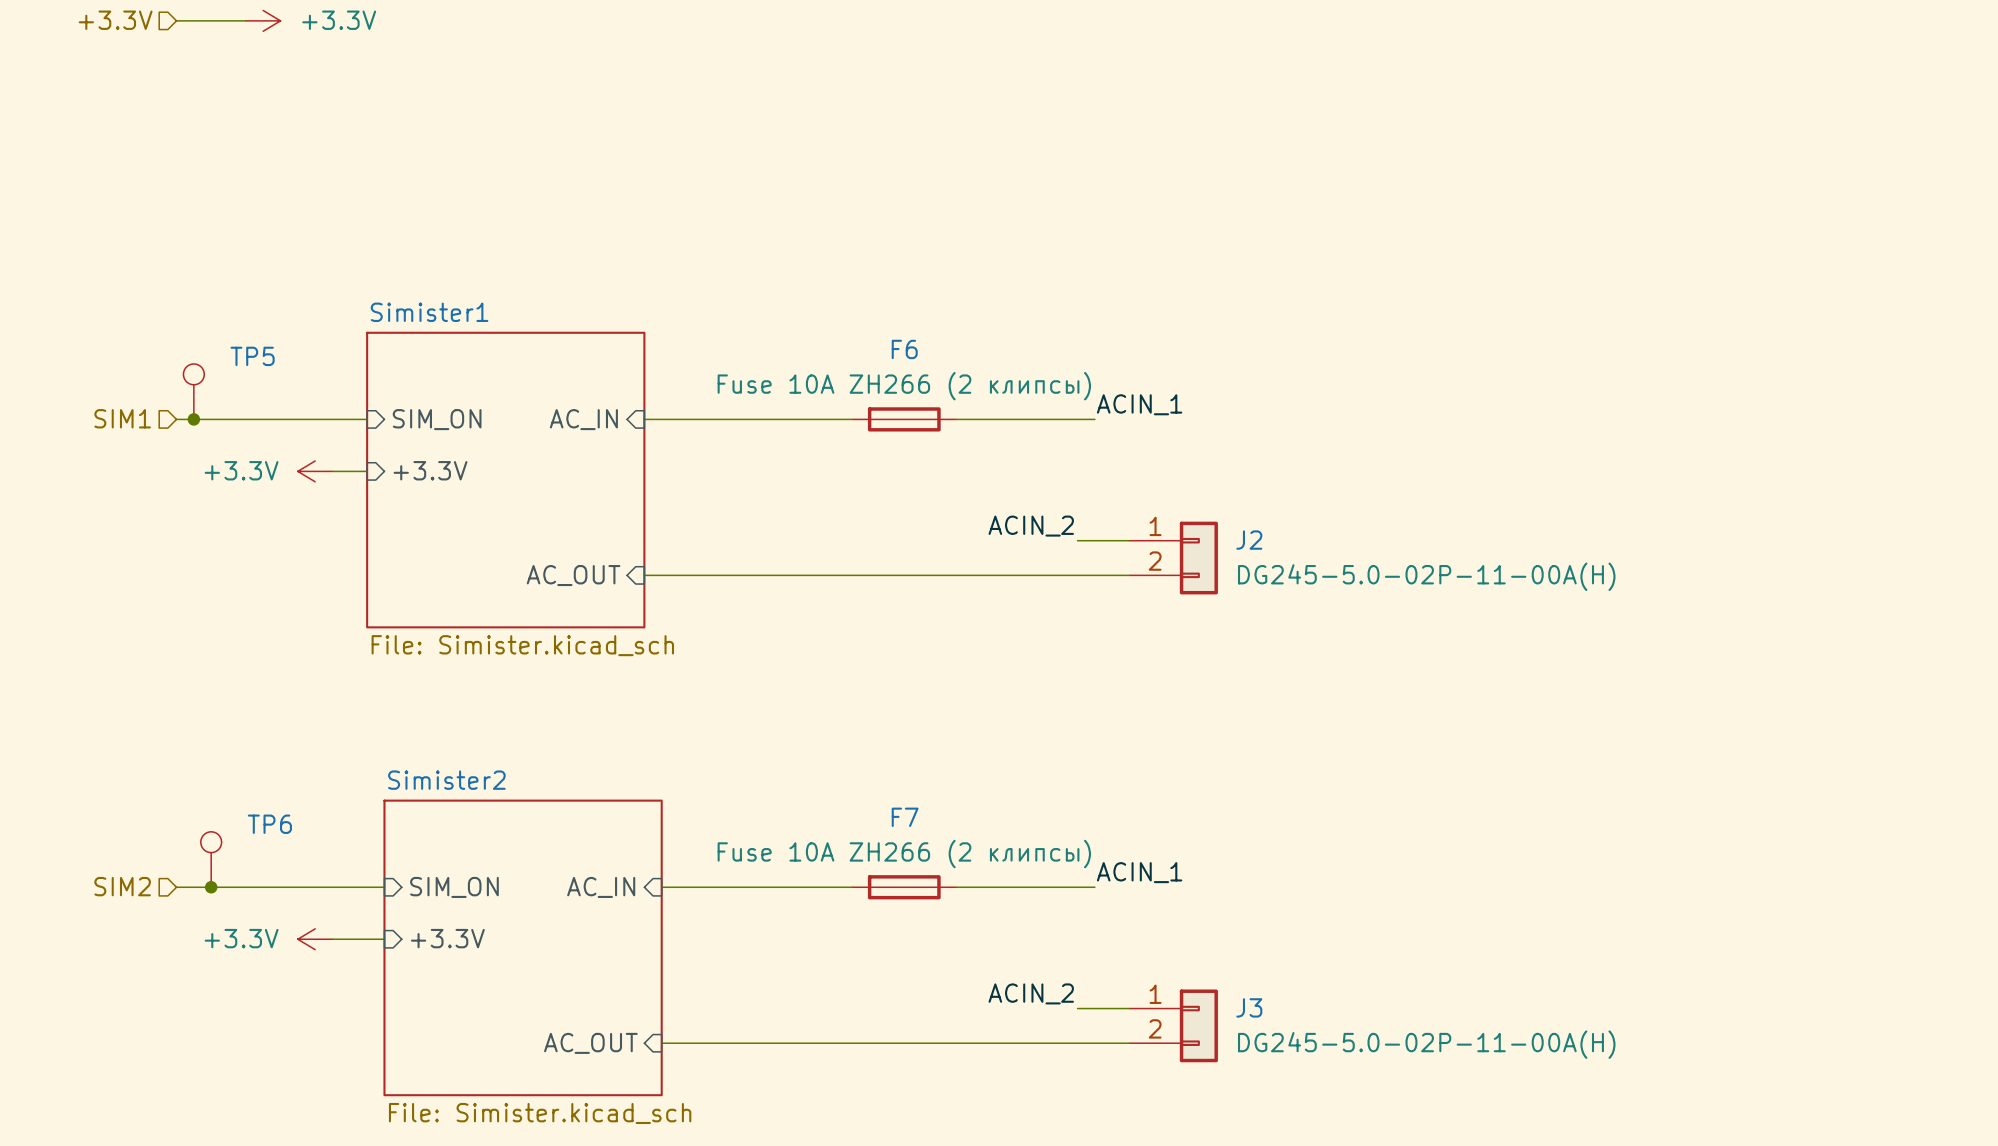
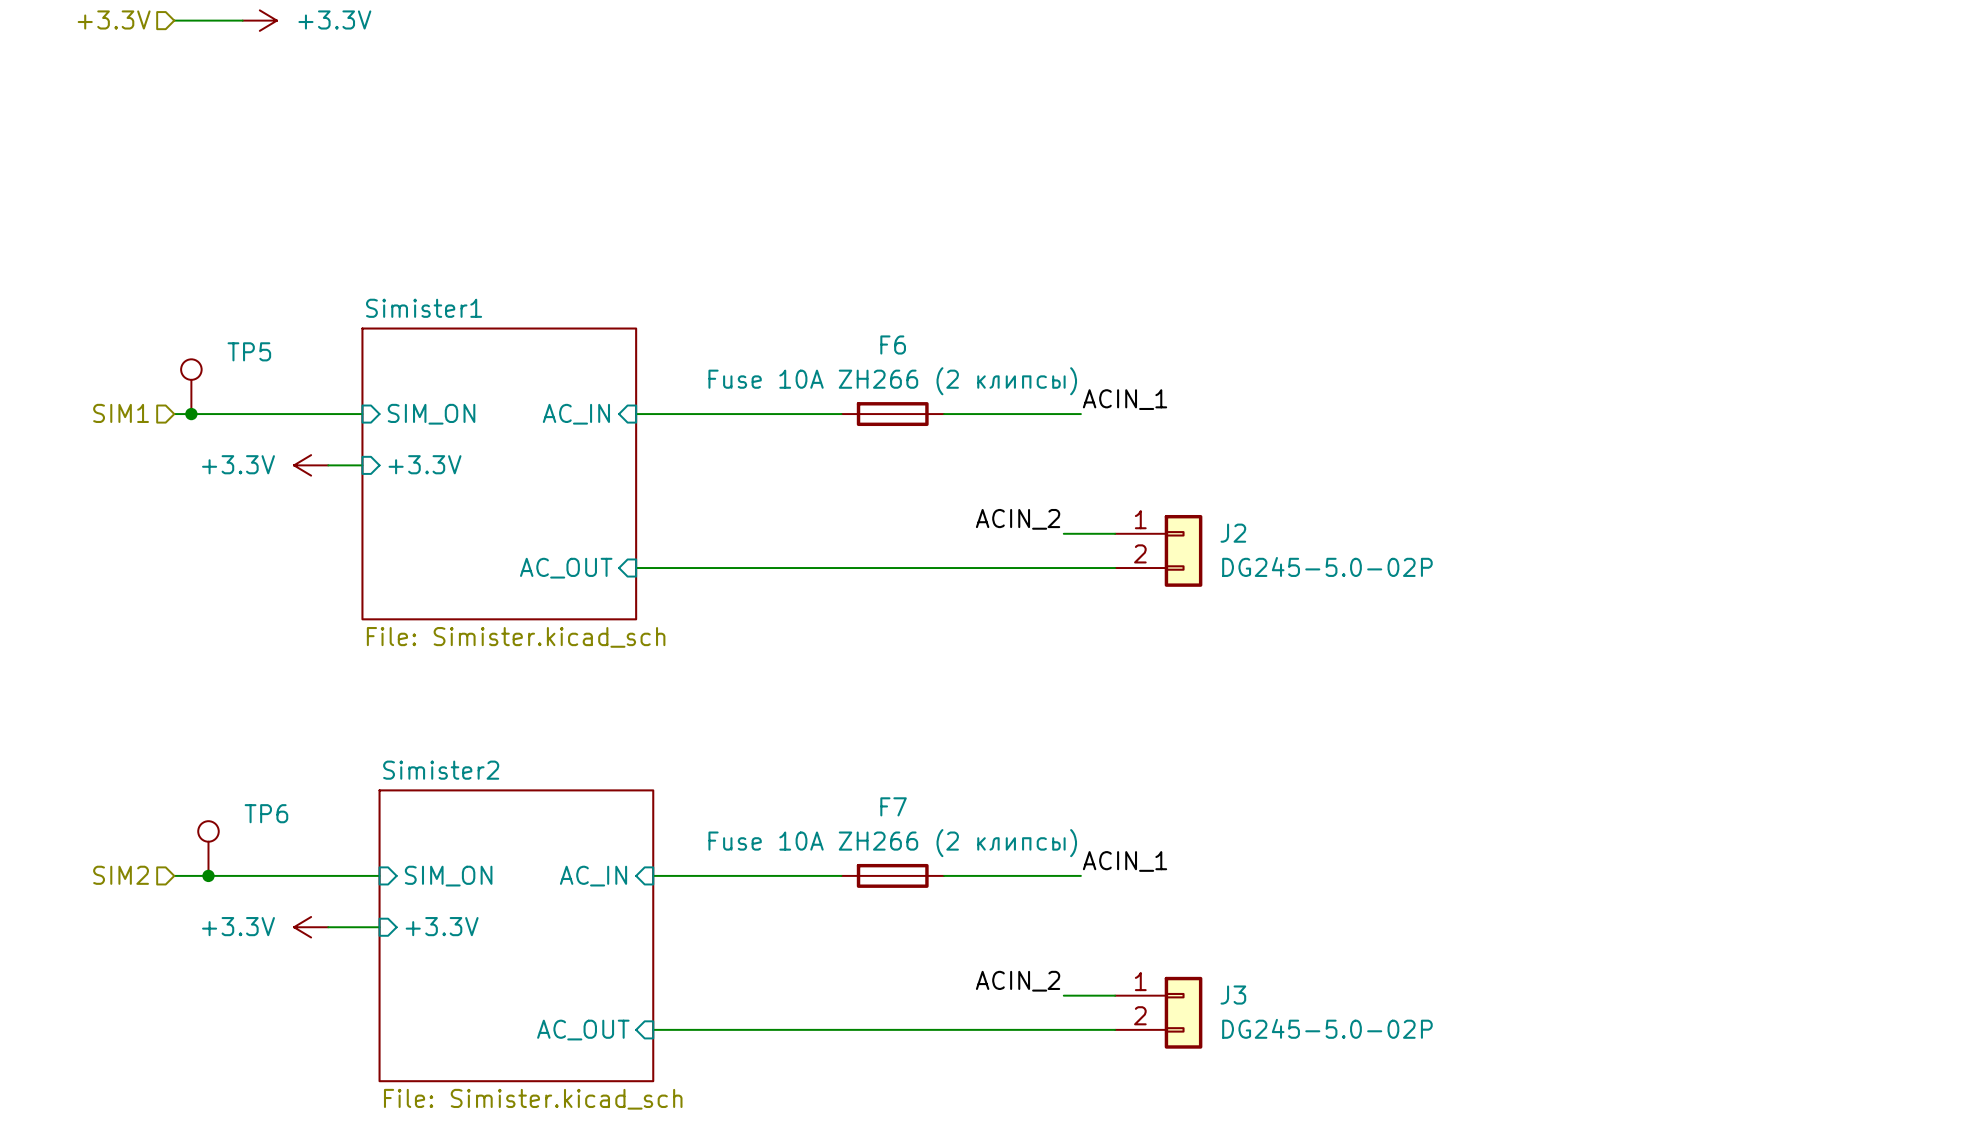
J2 value: DG245-5.0-02P-11-00A(H) (1426, 576) -> DG245-5.0-02P (1327, 566)
J3 value: DG245-5.0-02P-11-00A(H) (1426, 1044) -> DG245-5.0-02P (1327, 1028)

